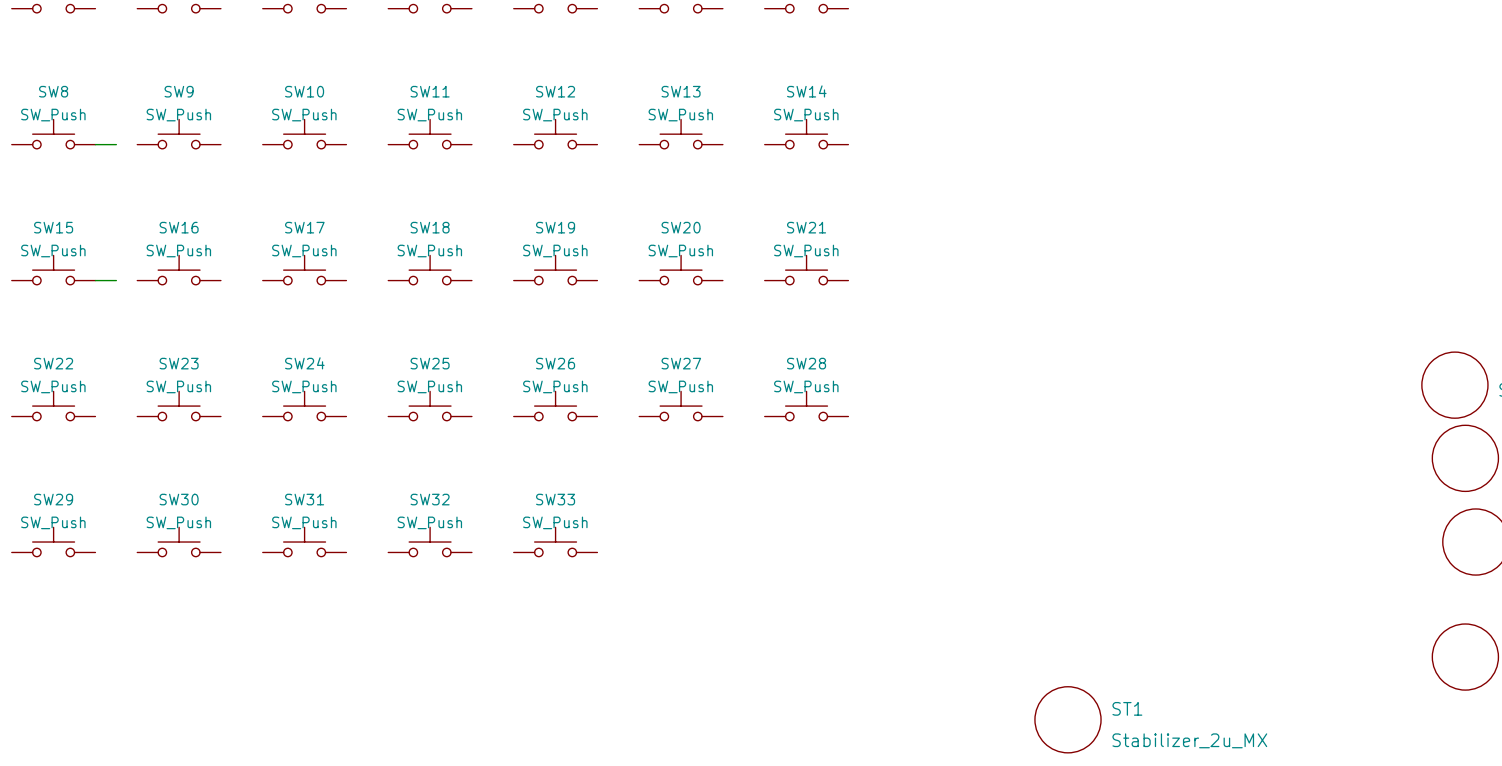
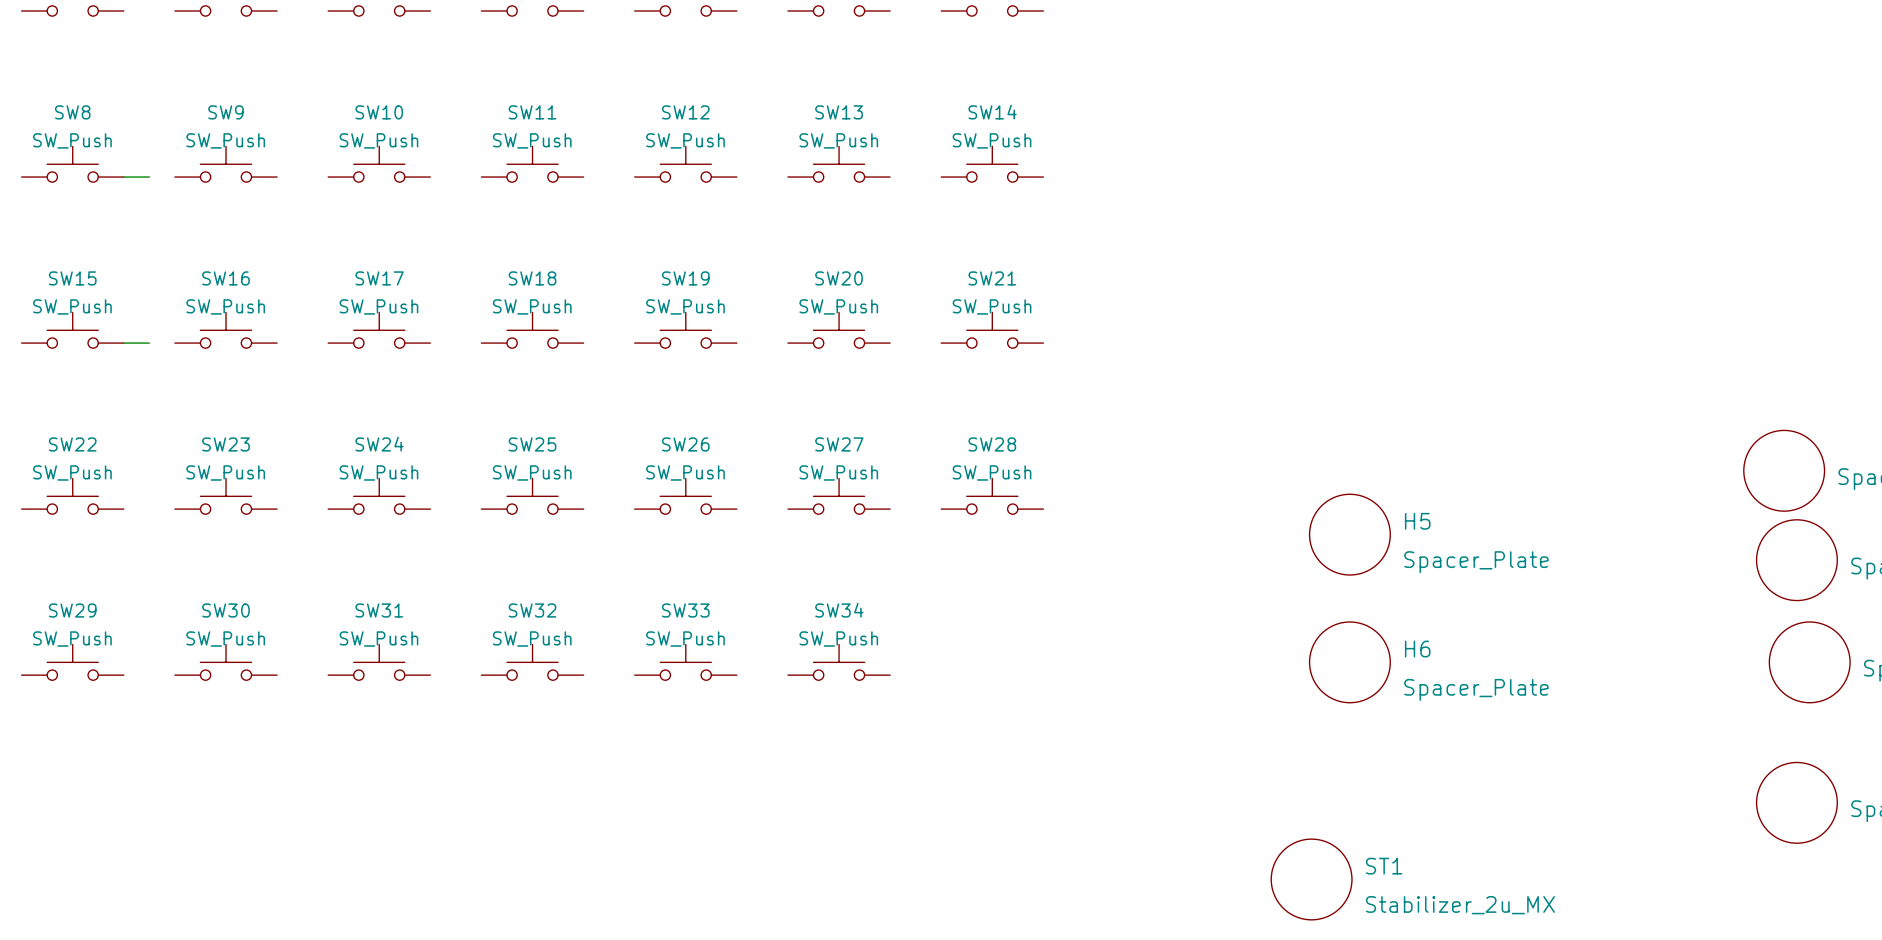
H5: none -> Spacer_Plate (1349, 534)
SW34: none -> SW_Push (839, 662)
H6: none -> Spacer_Plate (1349, 662)

